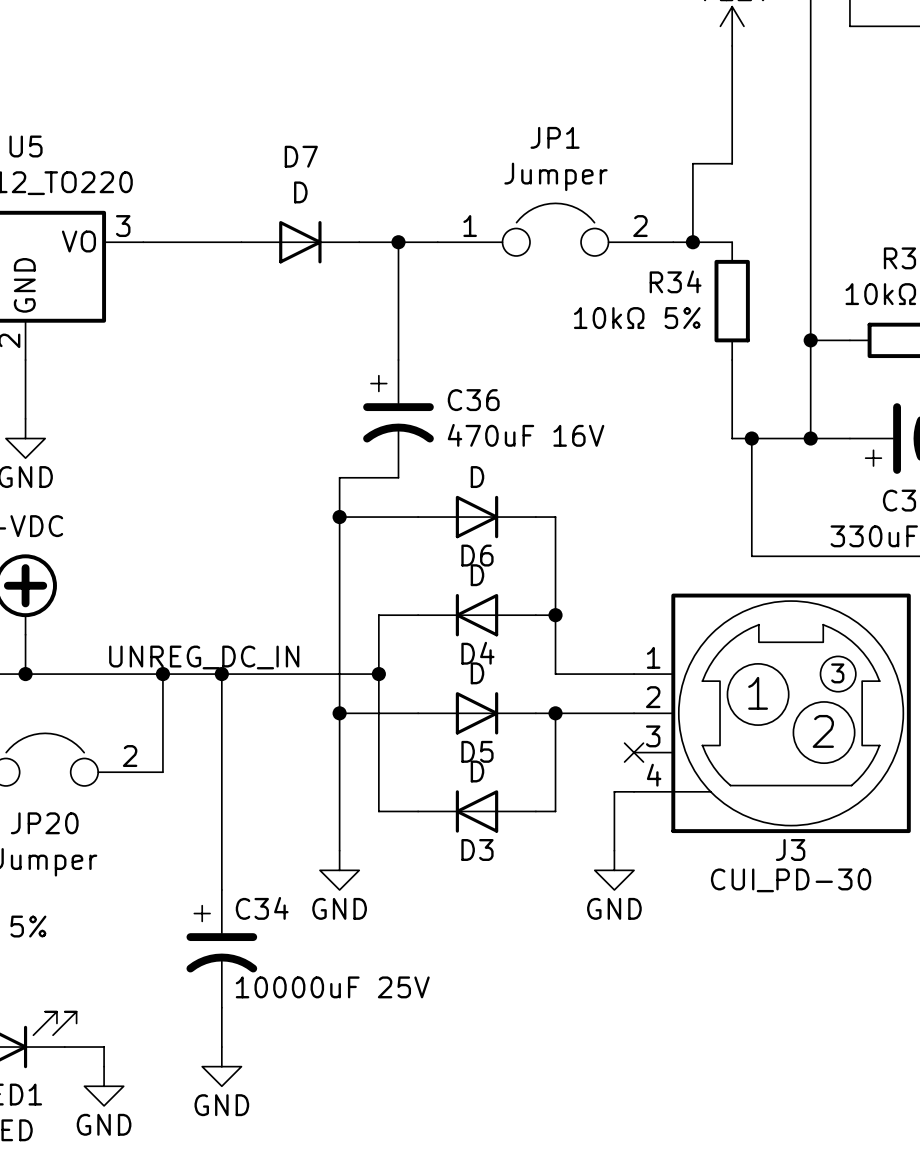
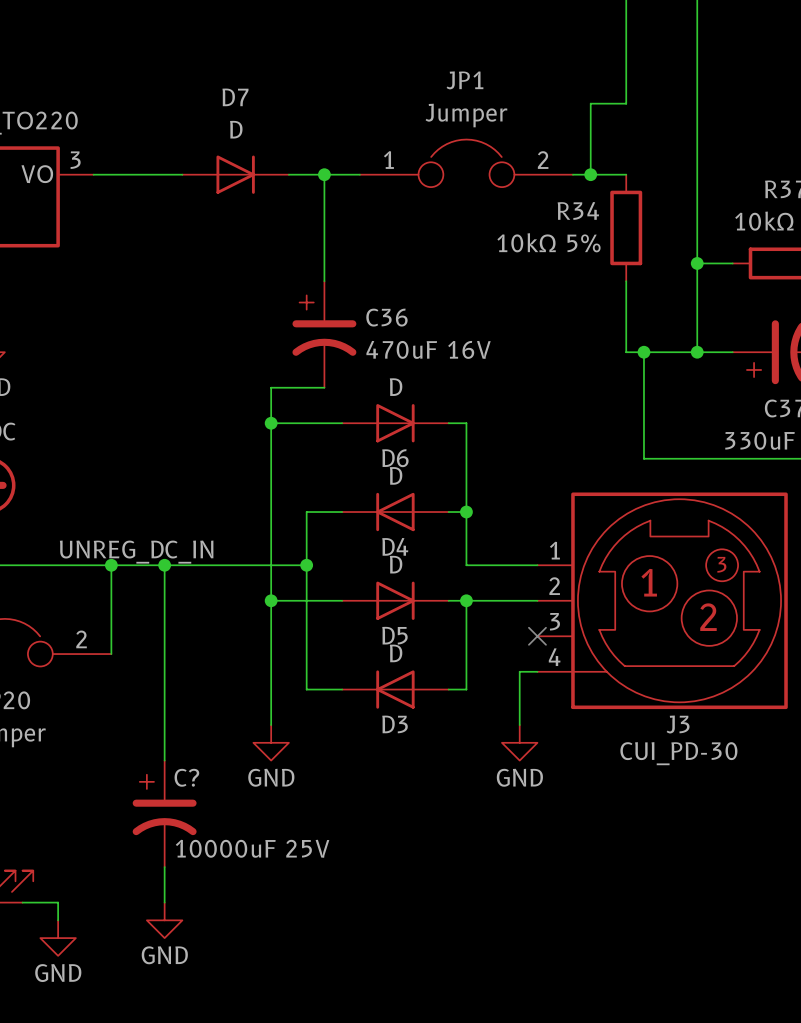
C34 name: C34 (262, 908) -> C? (186, 777)

